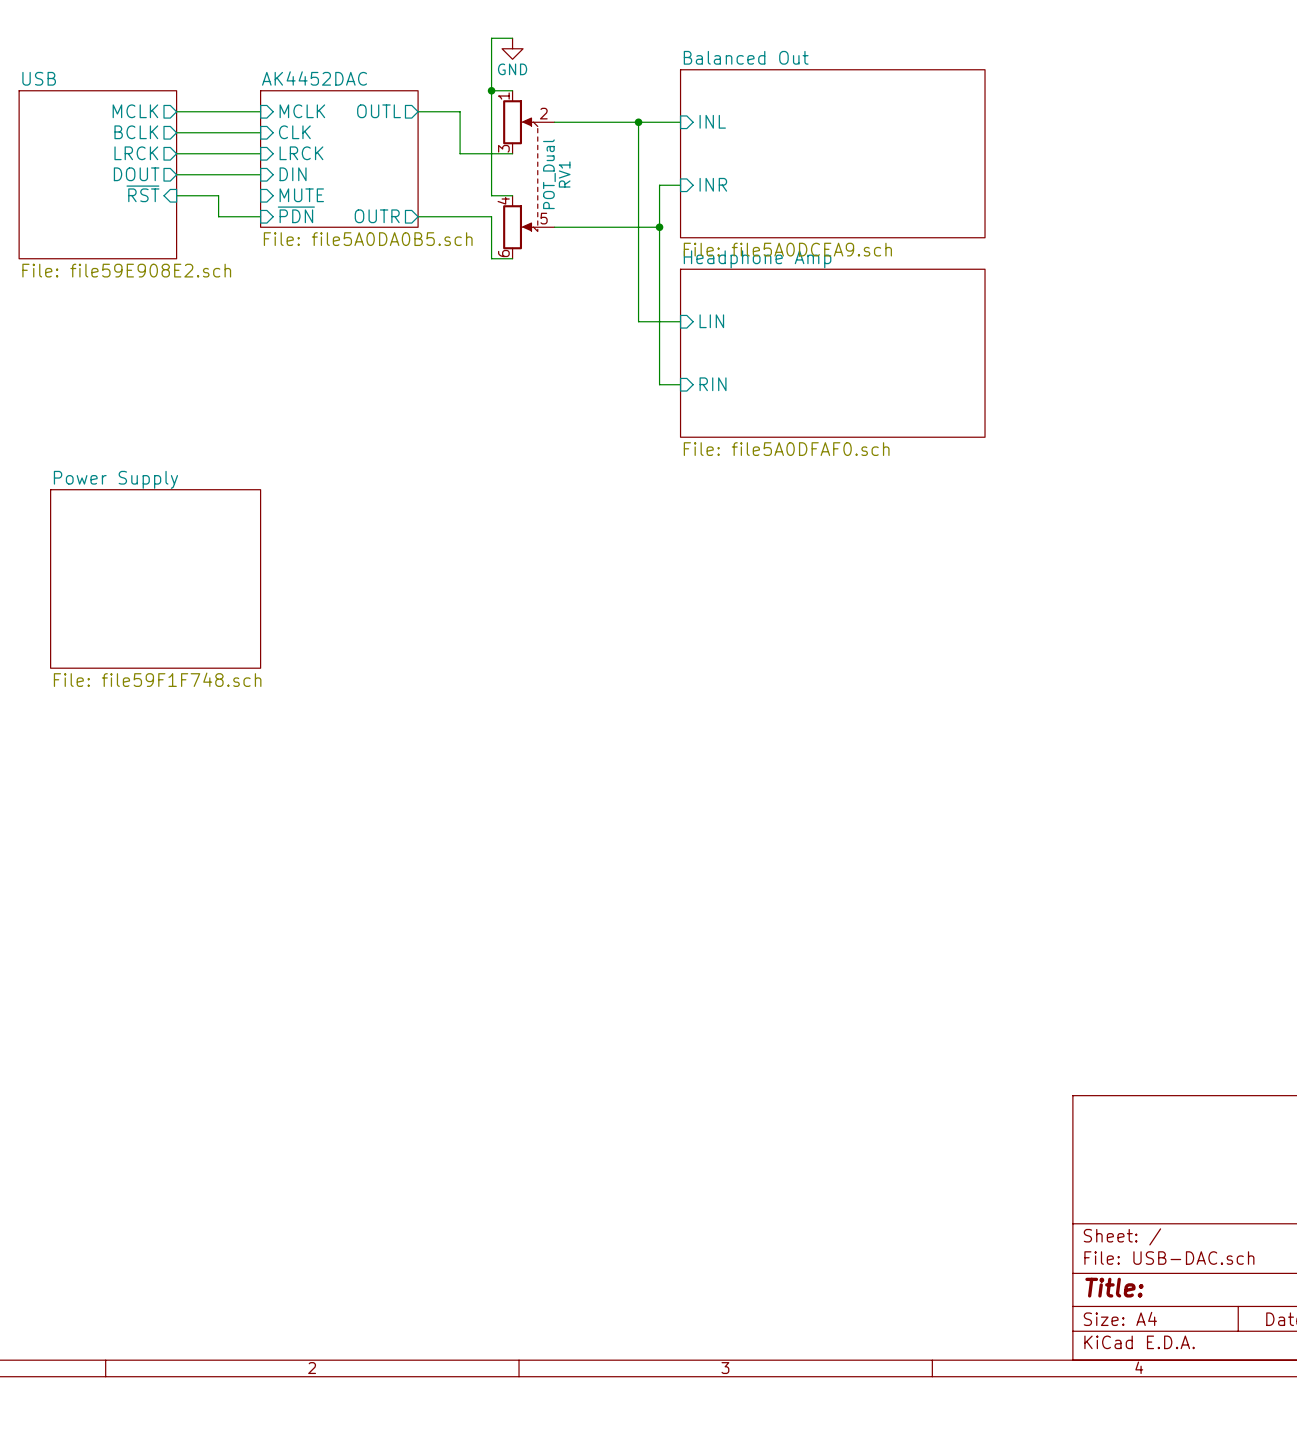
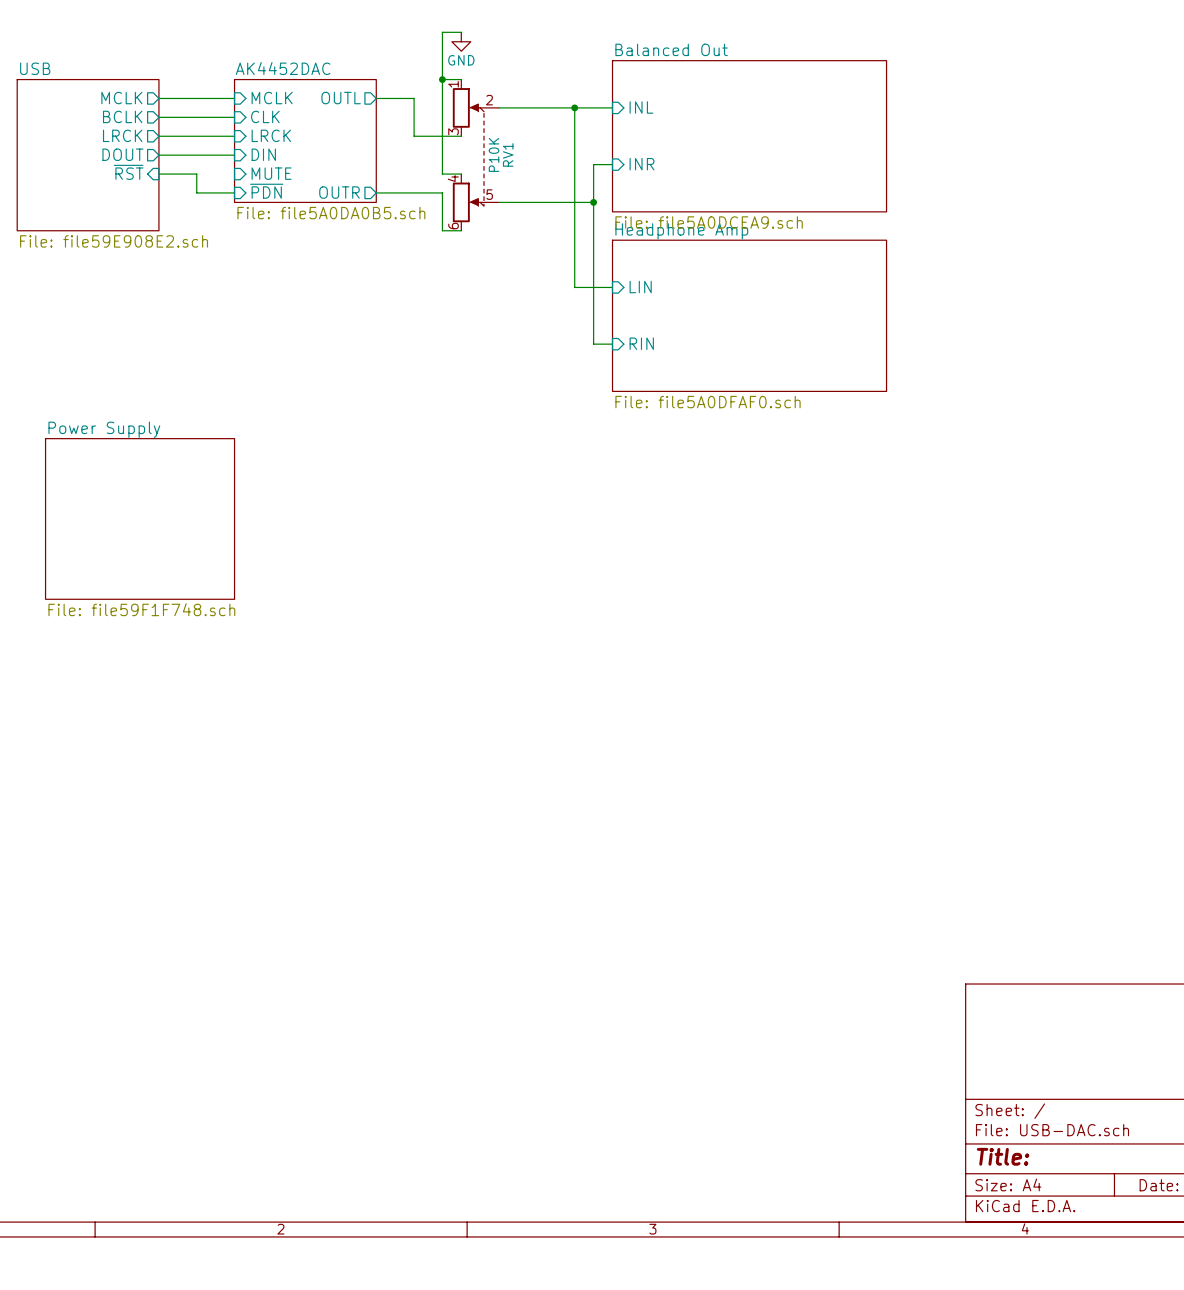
RV1 value: POT_Dual (549, 174) -> P10K (494, 154)

